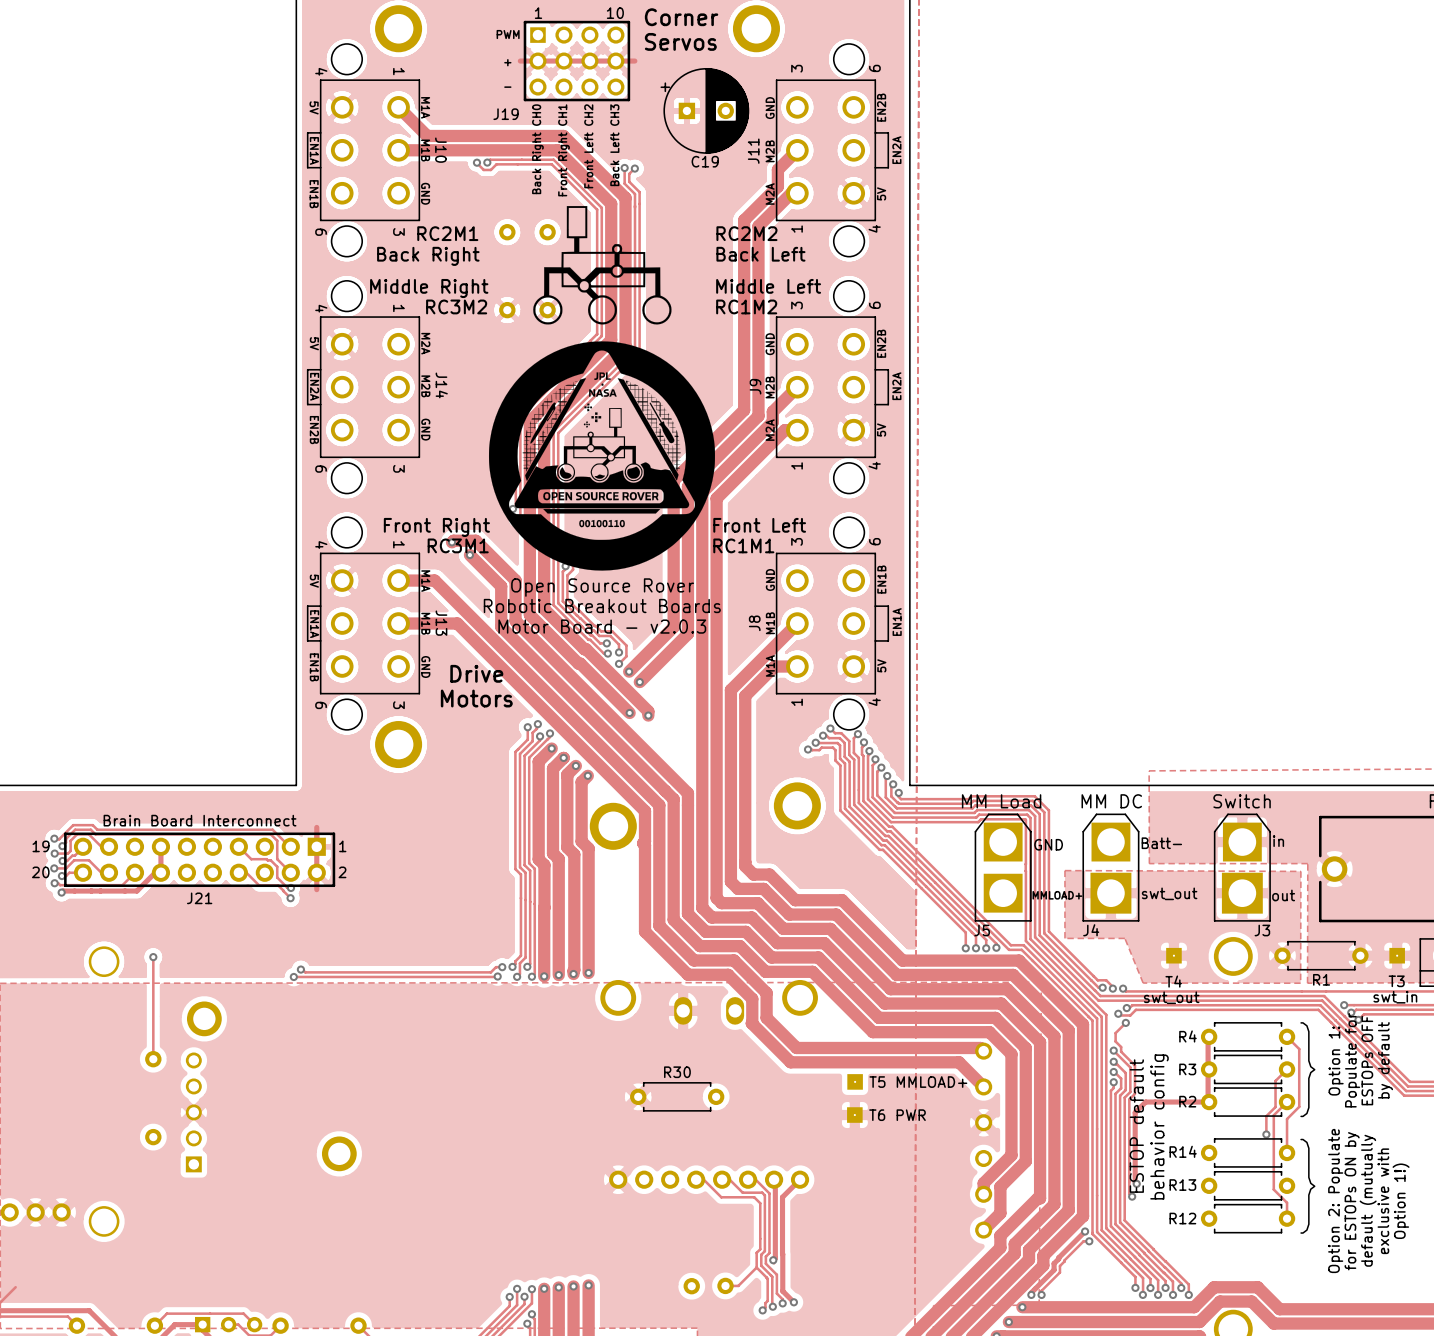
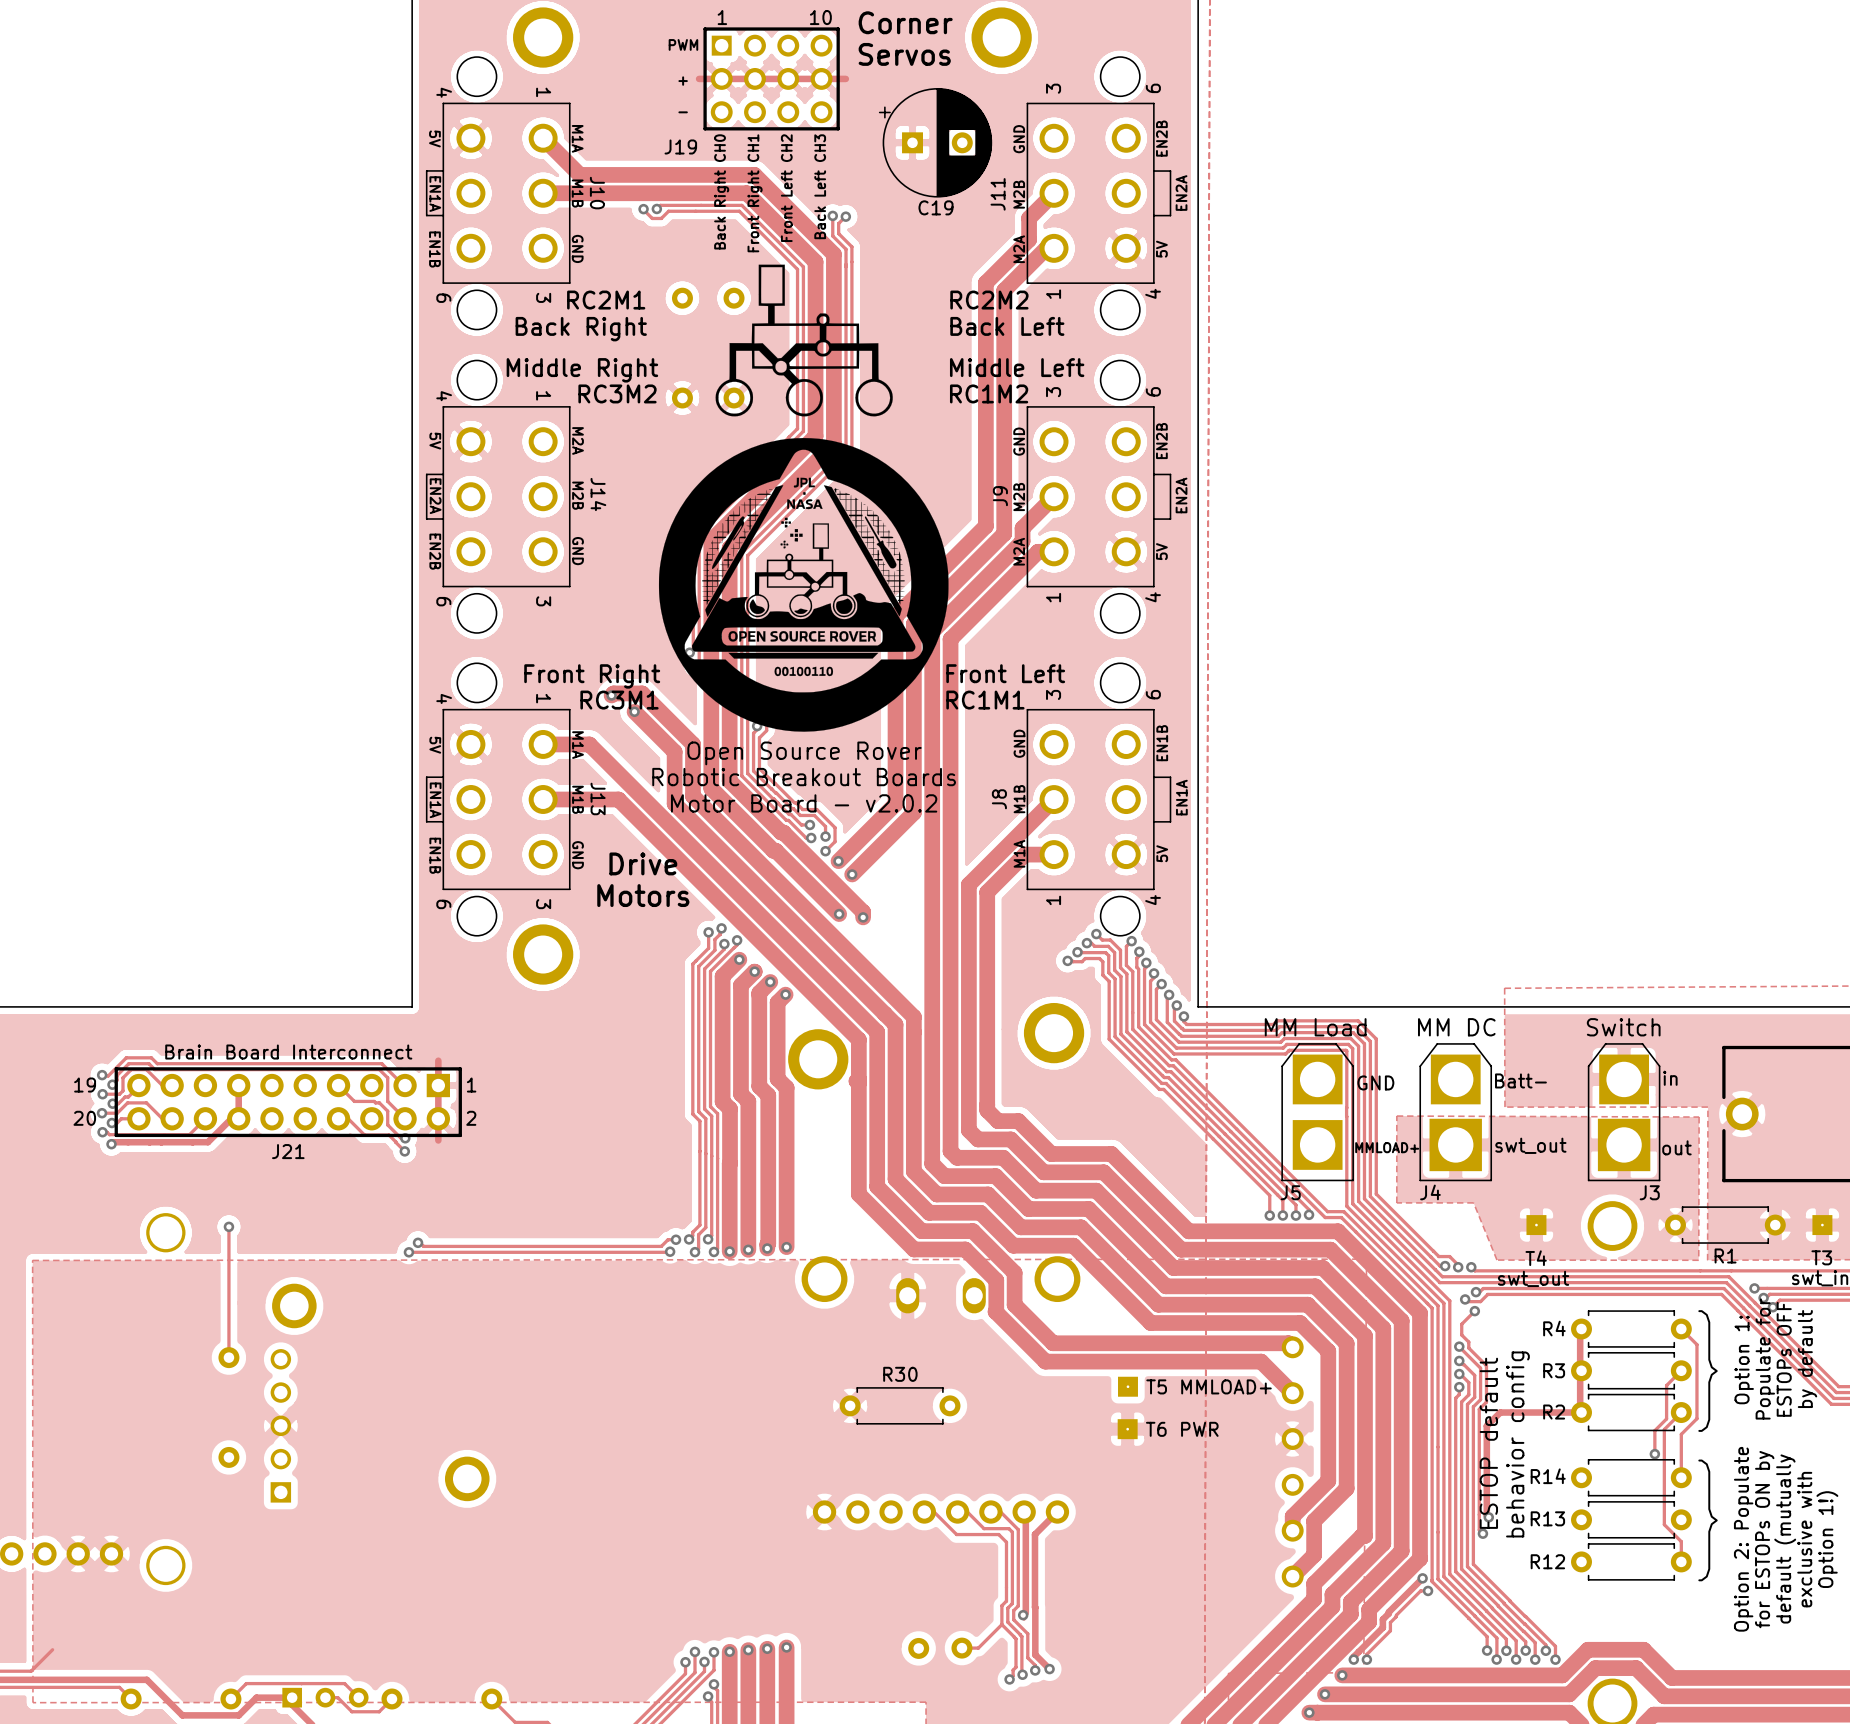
text: Motor Board - v2.0.3 (602, 626) -> Motor Board - v2.0.2 (804, 803)

